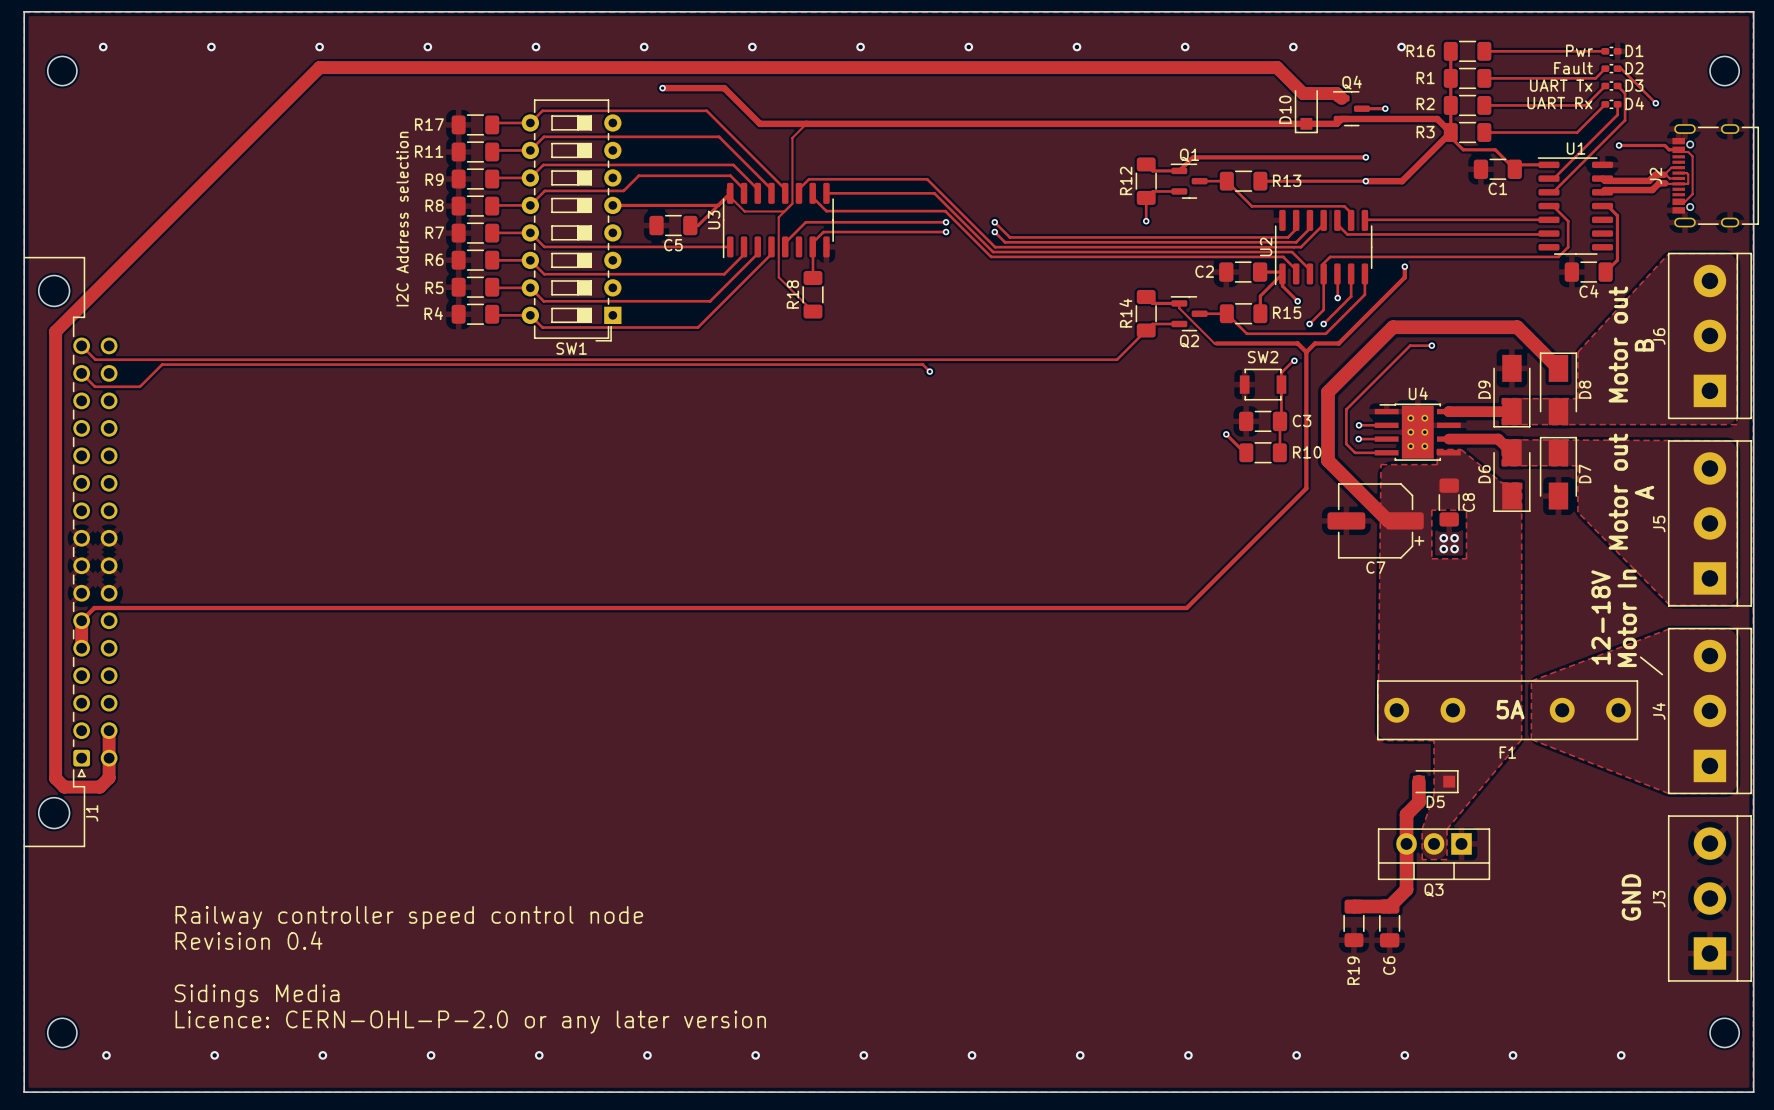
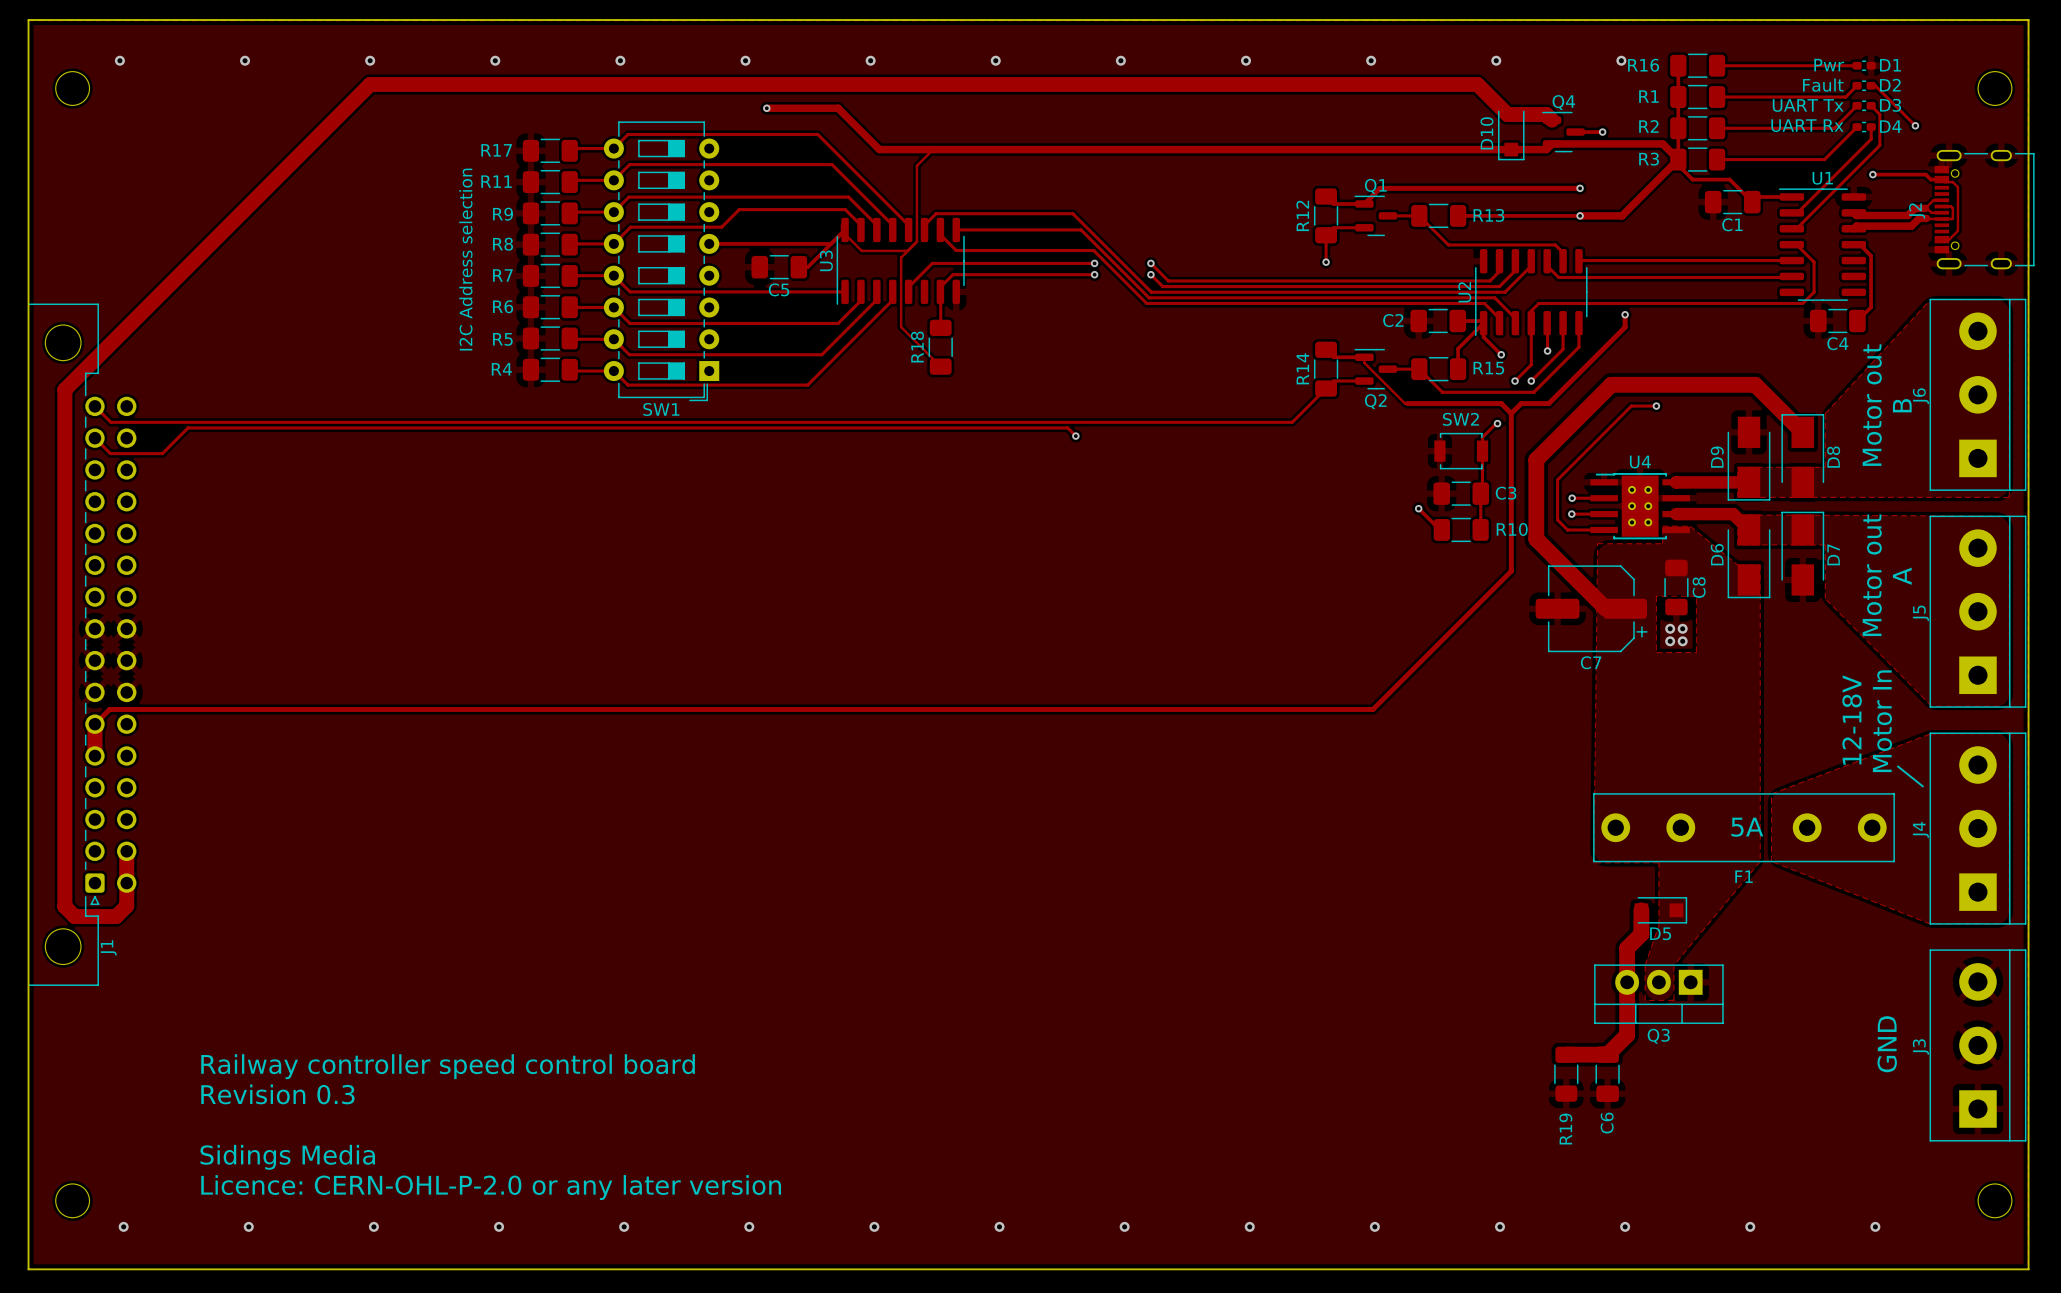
text: Railway controller speed control node (409, 917) -> Railway controller speed control board (448, 1066)
text: Revision 0.4 (248, 940) -> Revision 0.3 (277, 1094)

